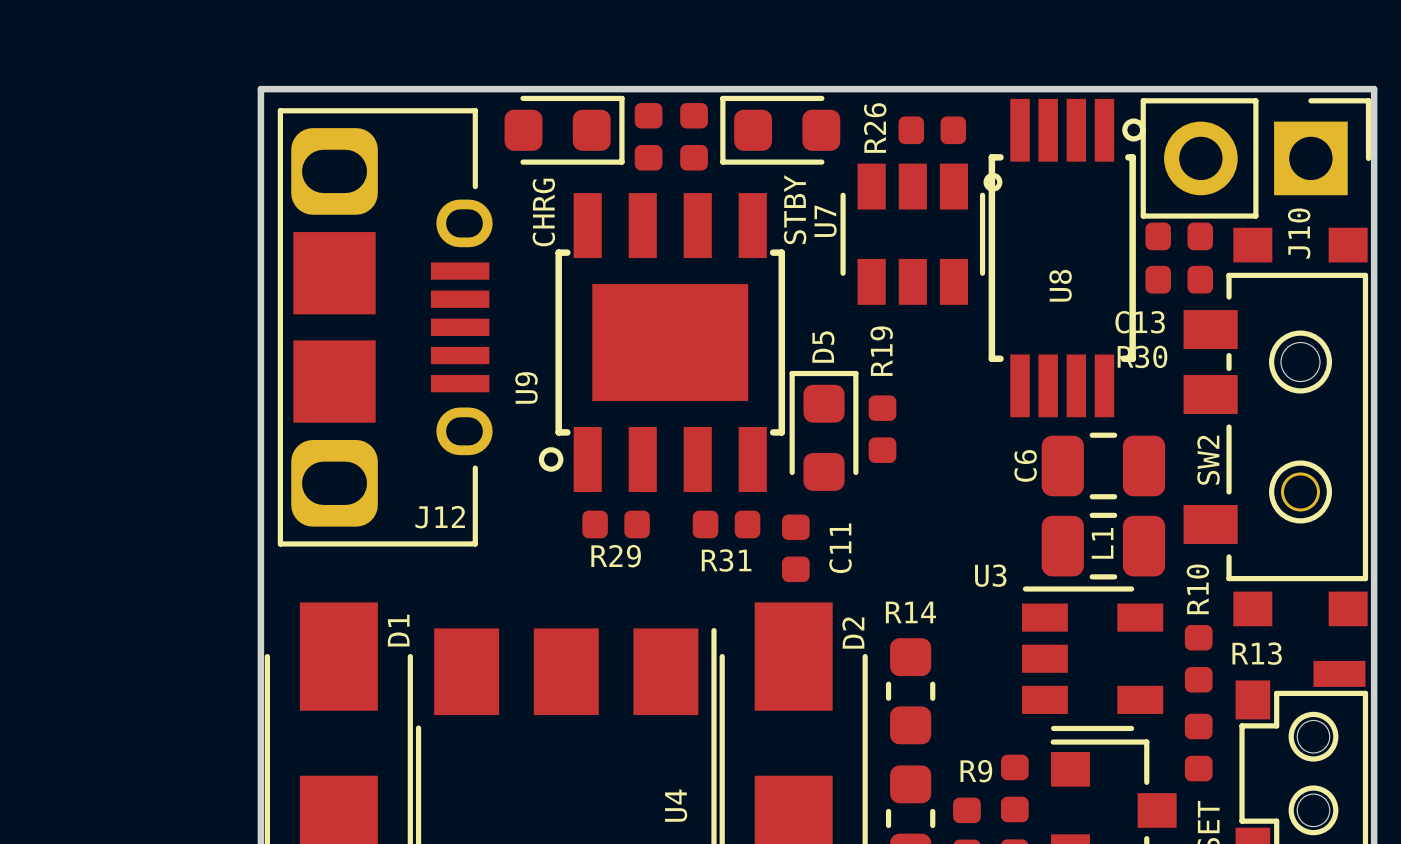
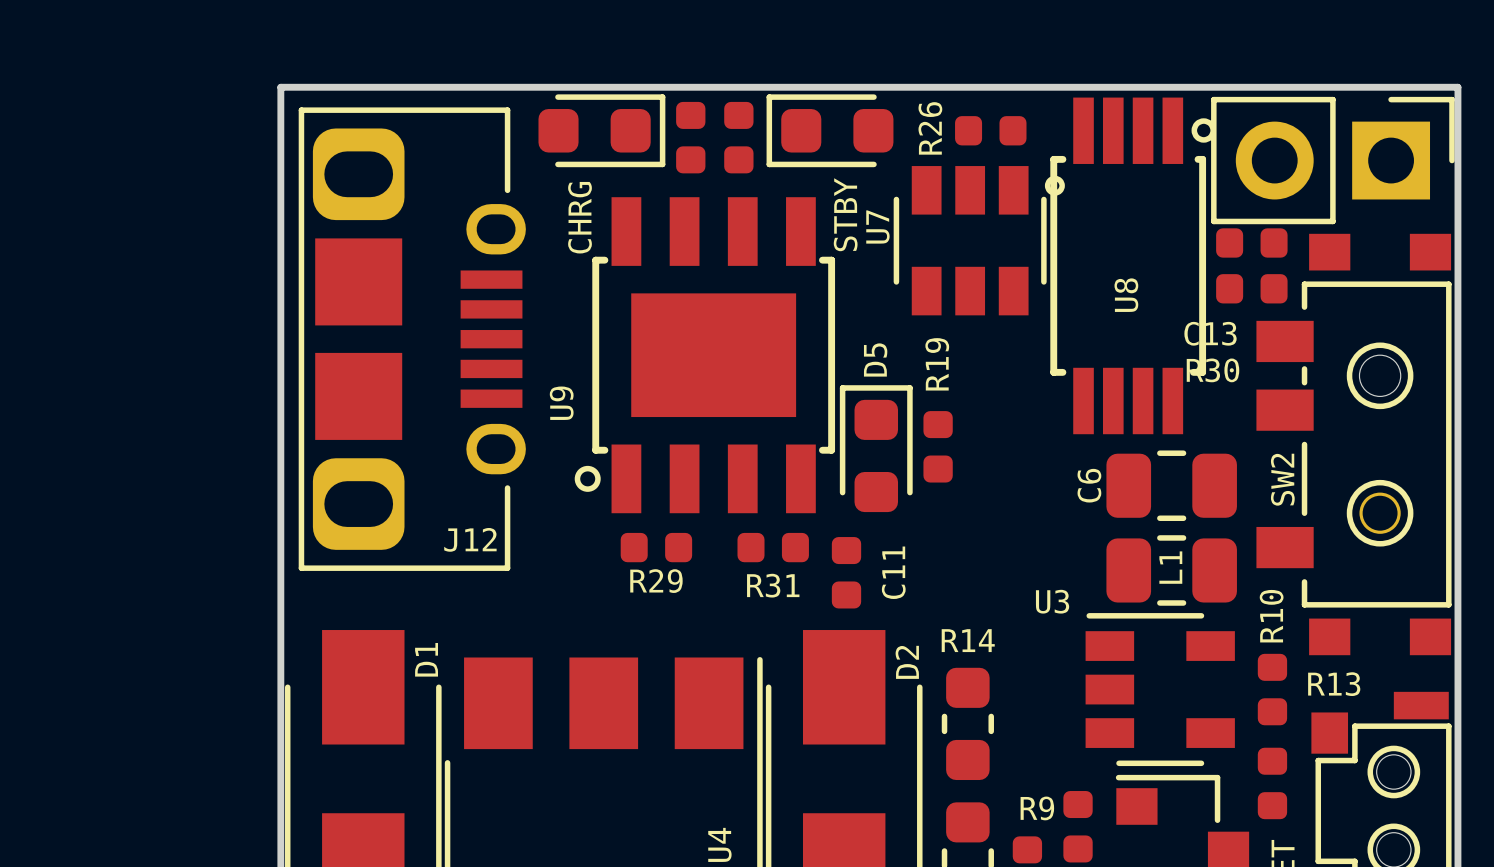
J10 name: J10 (1299, 233) -> none

